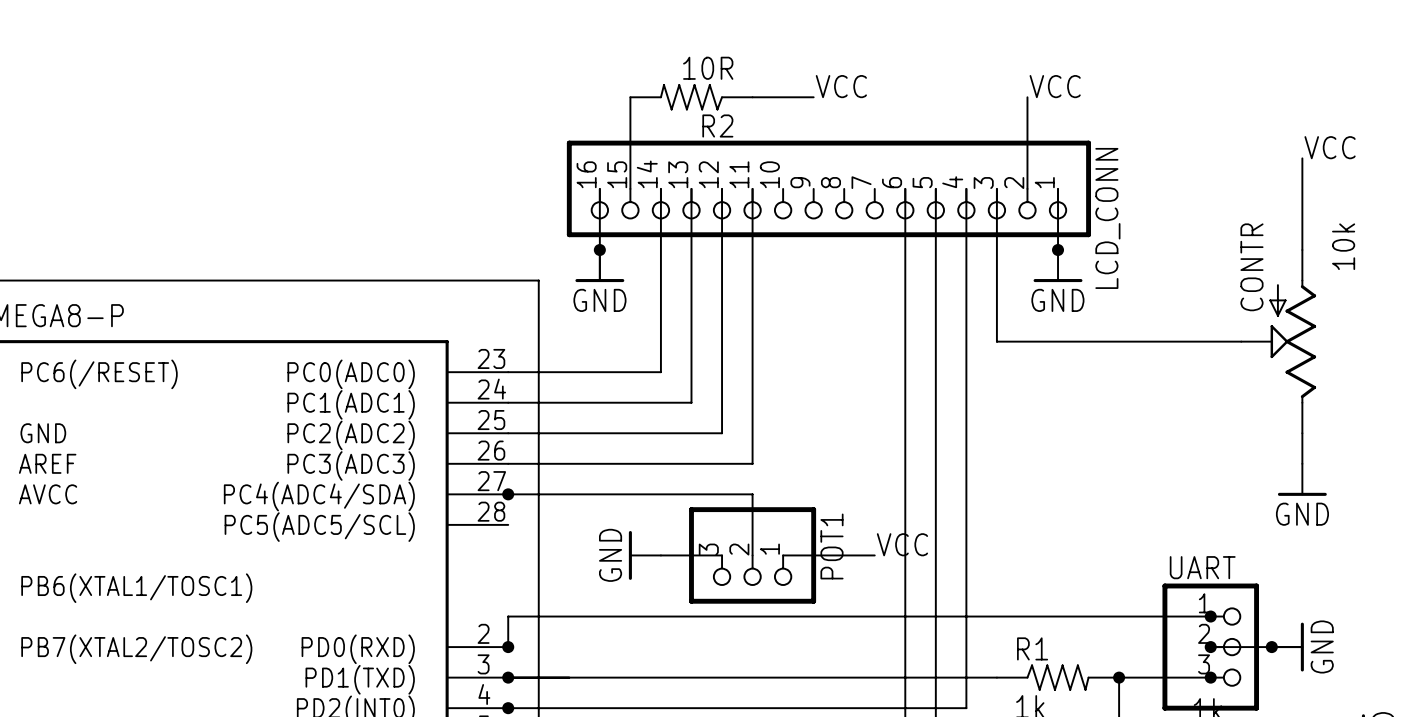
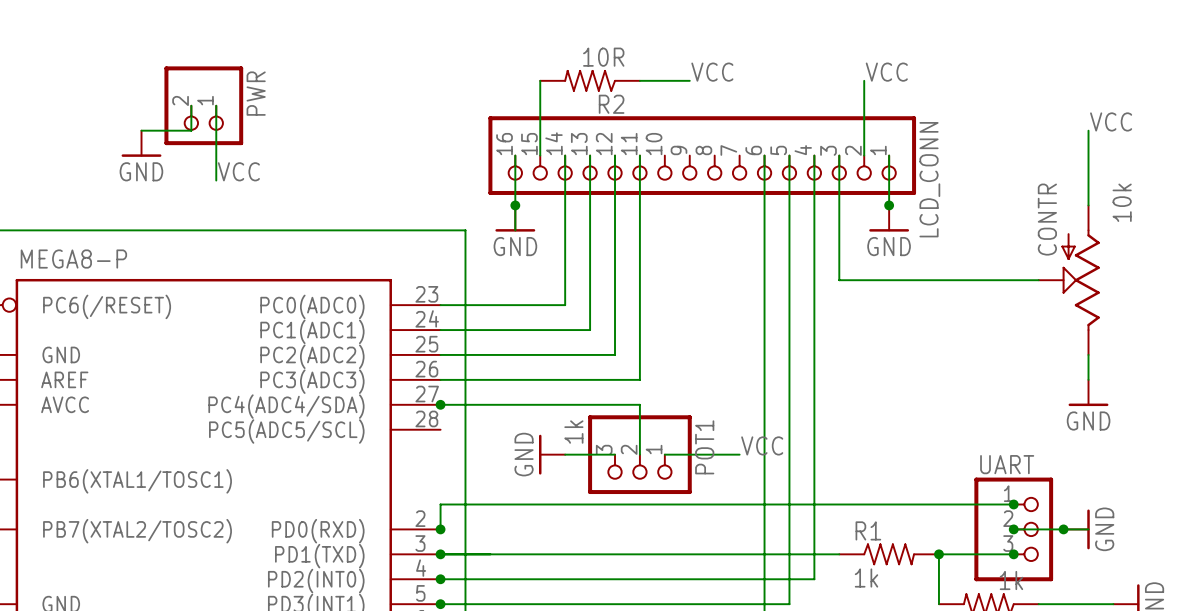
wire: none -> (191, 105) (191, 130) (141, 130)
PWR: none -> (203, 105)
wire: none -> (216, 105) (216, 180)
power symbol: none -> GND (141, 143)
label: none -> VCC (238, 171)
POT1 value: none -> 1k (573, 432)

